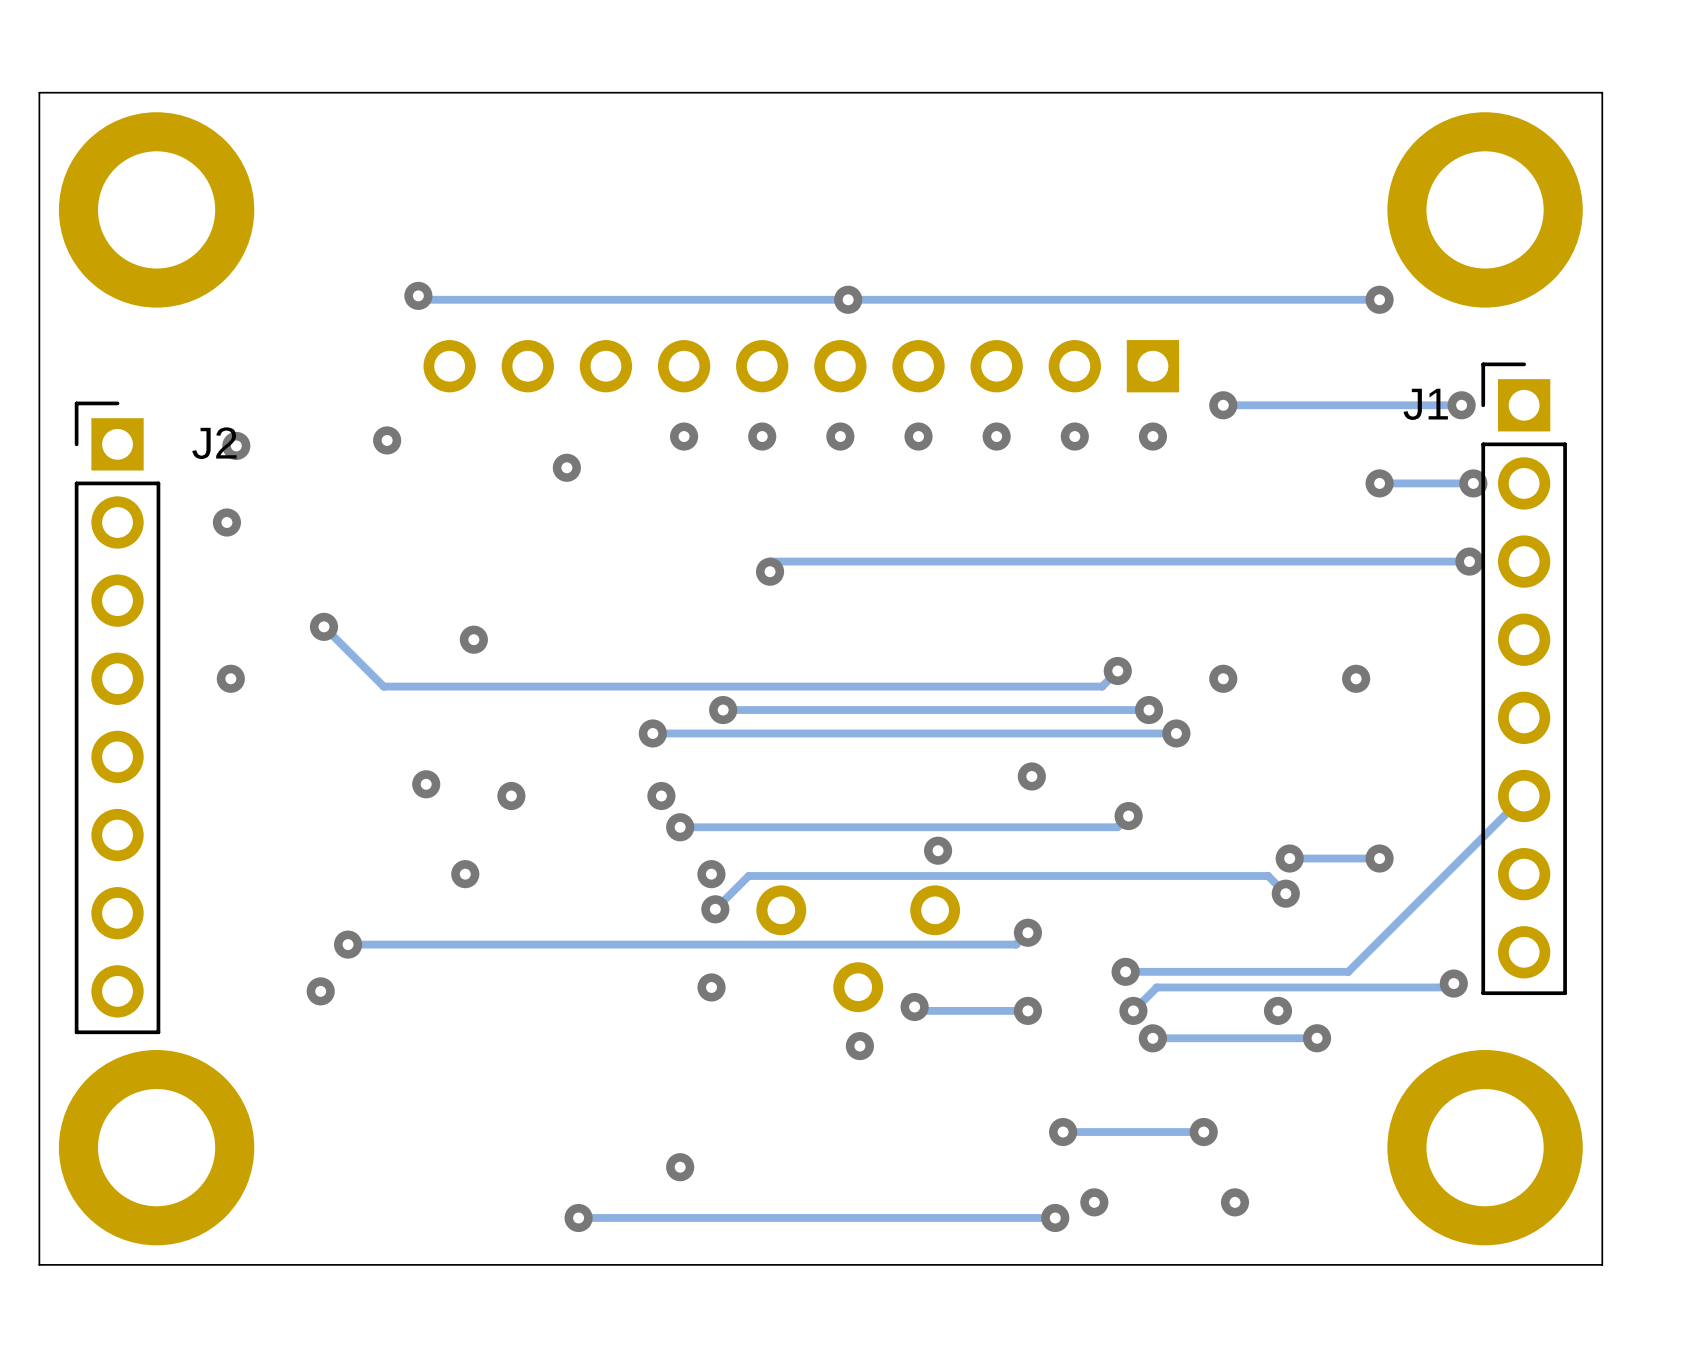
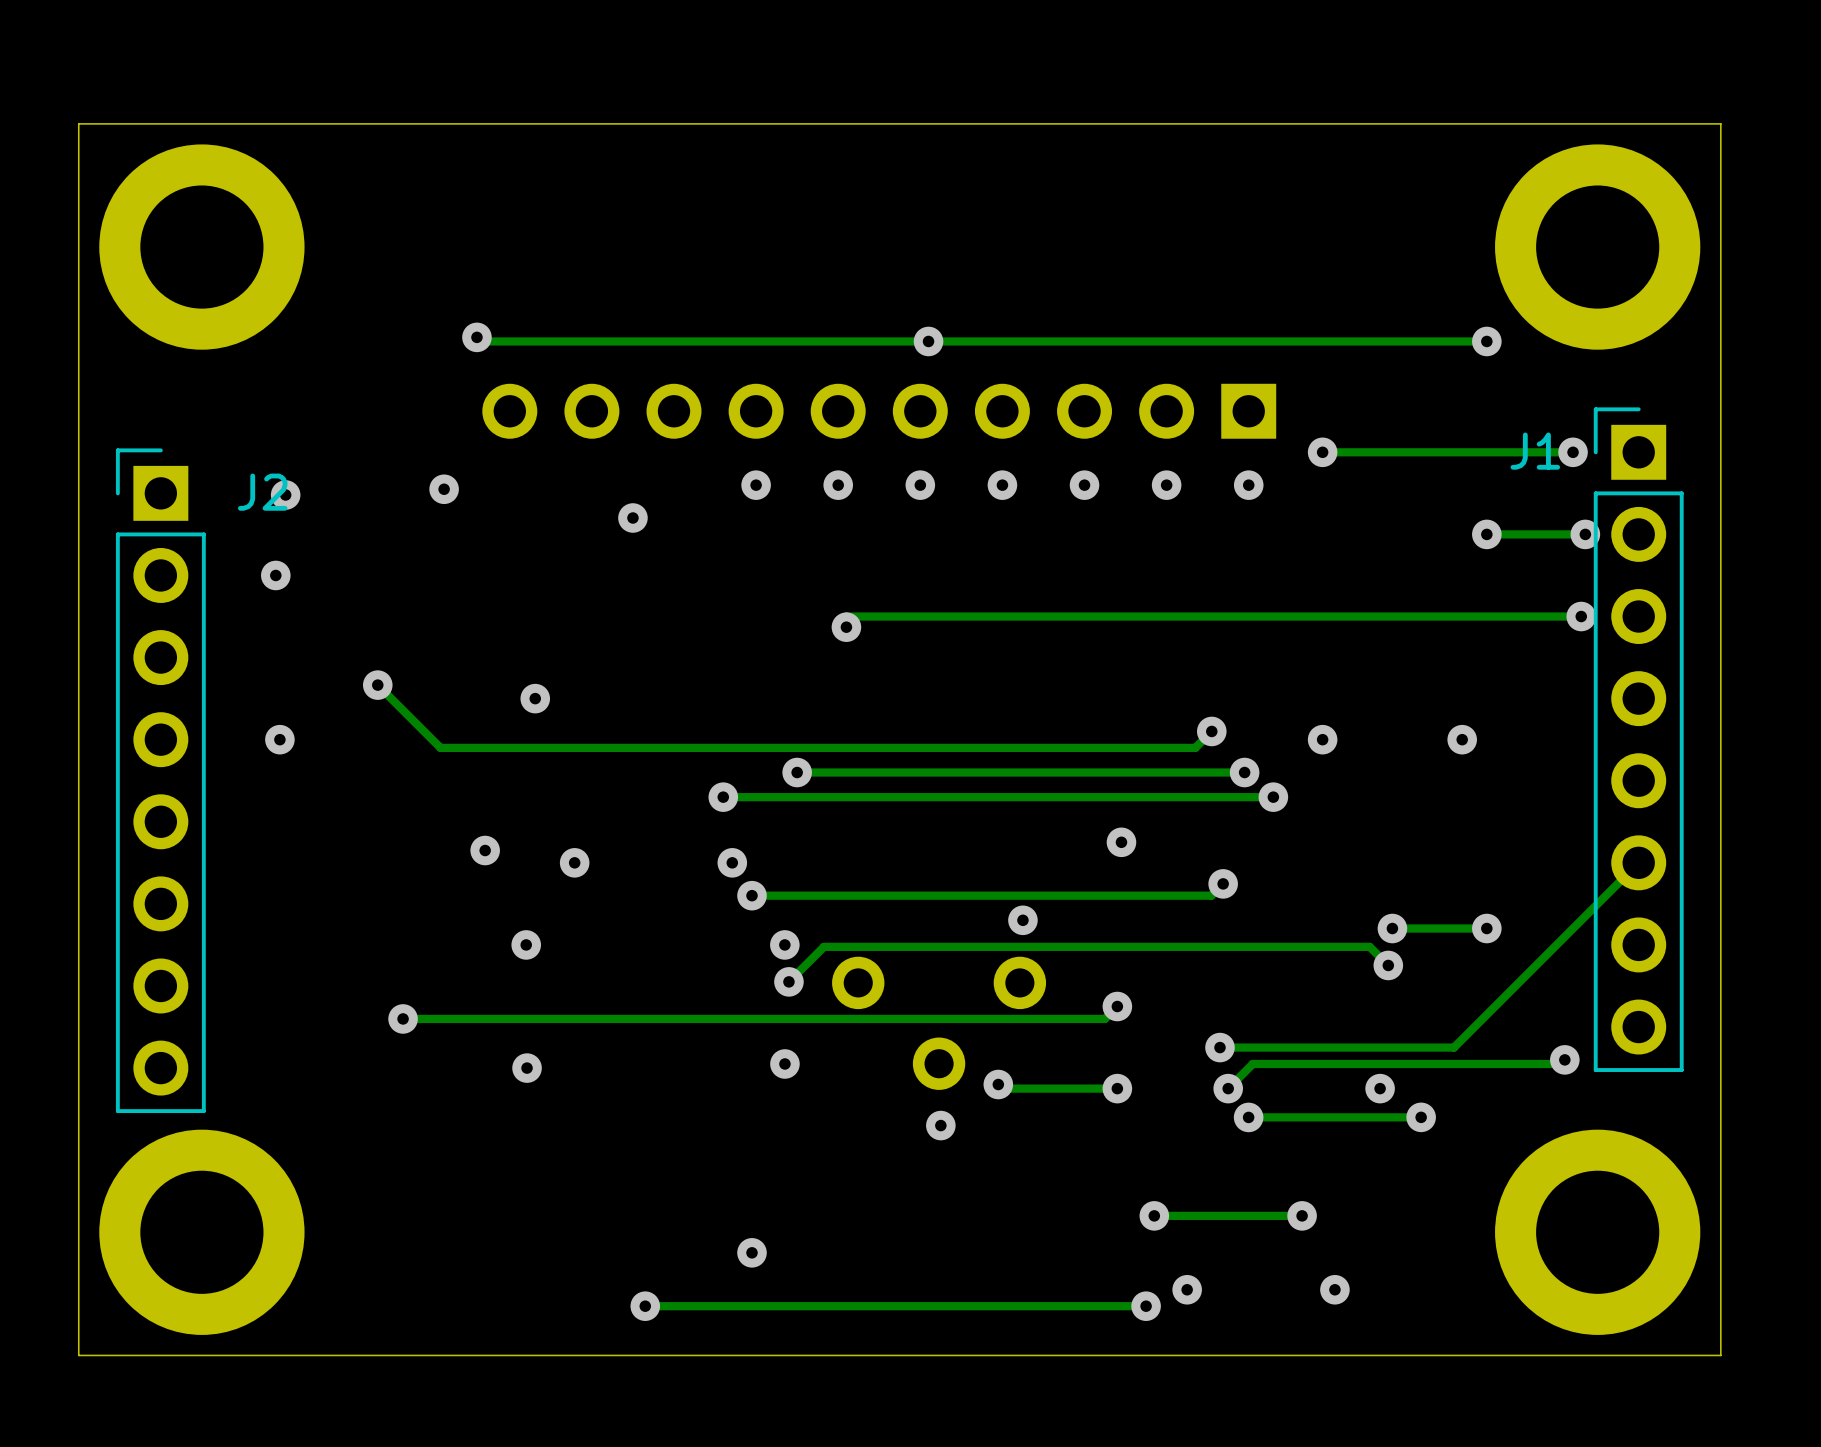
via position: (320, 991) -> (527, 1068)

